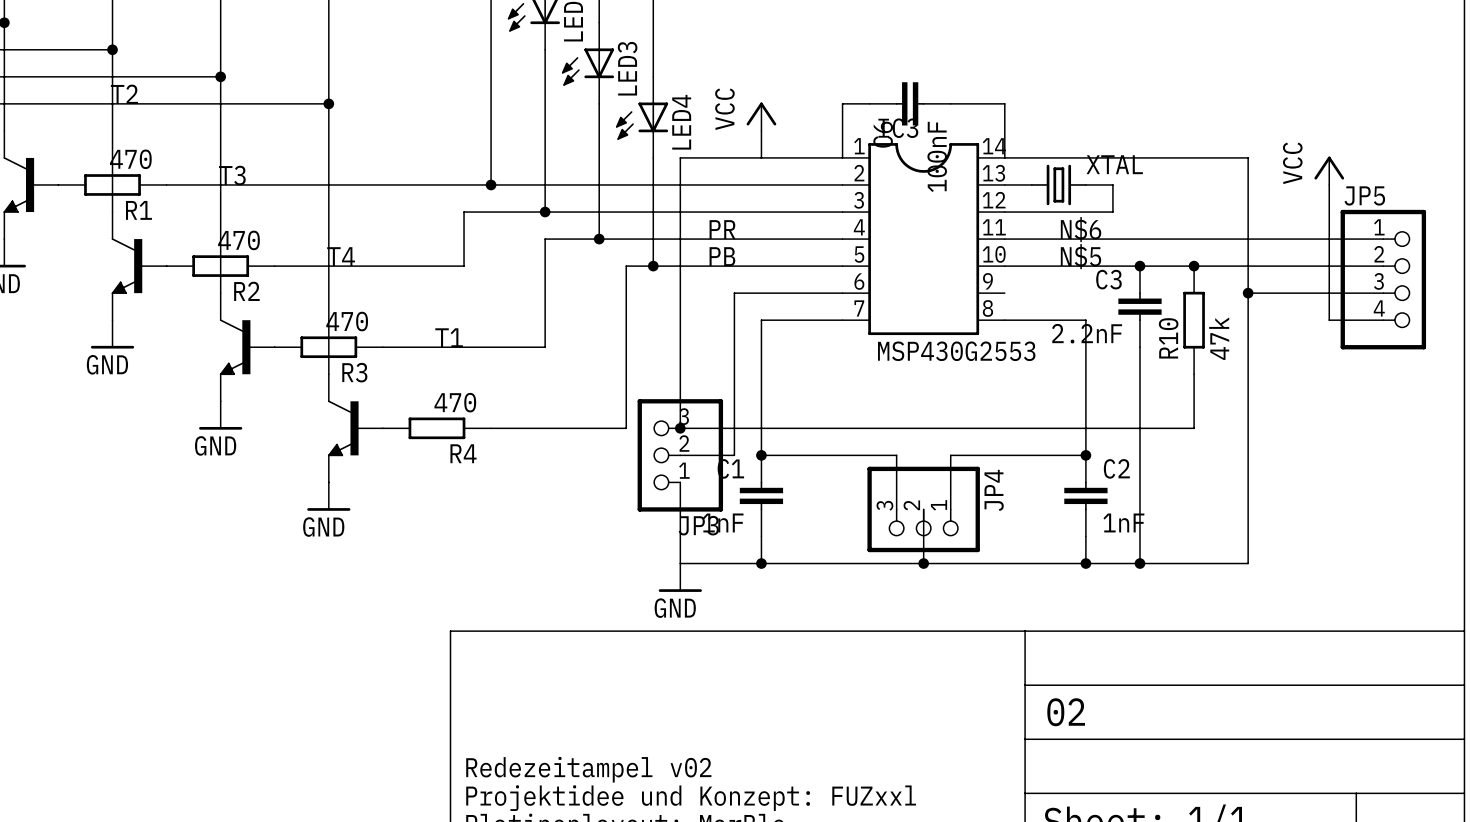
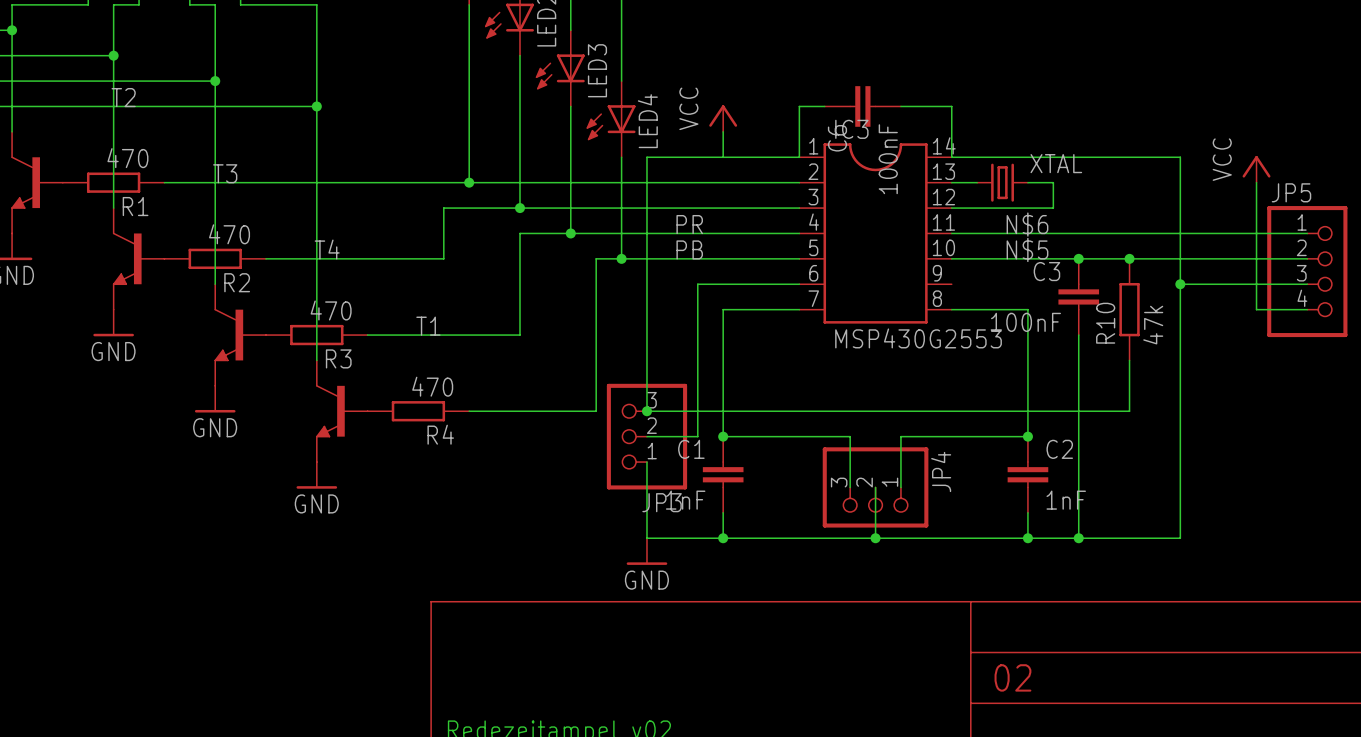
C3 value: 2.2nF (1087, 333) -> 100nF (1025, 322)

